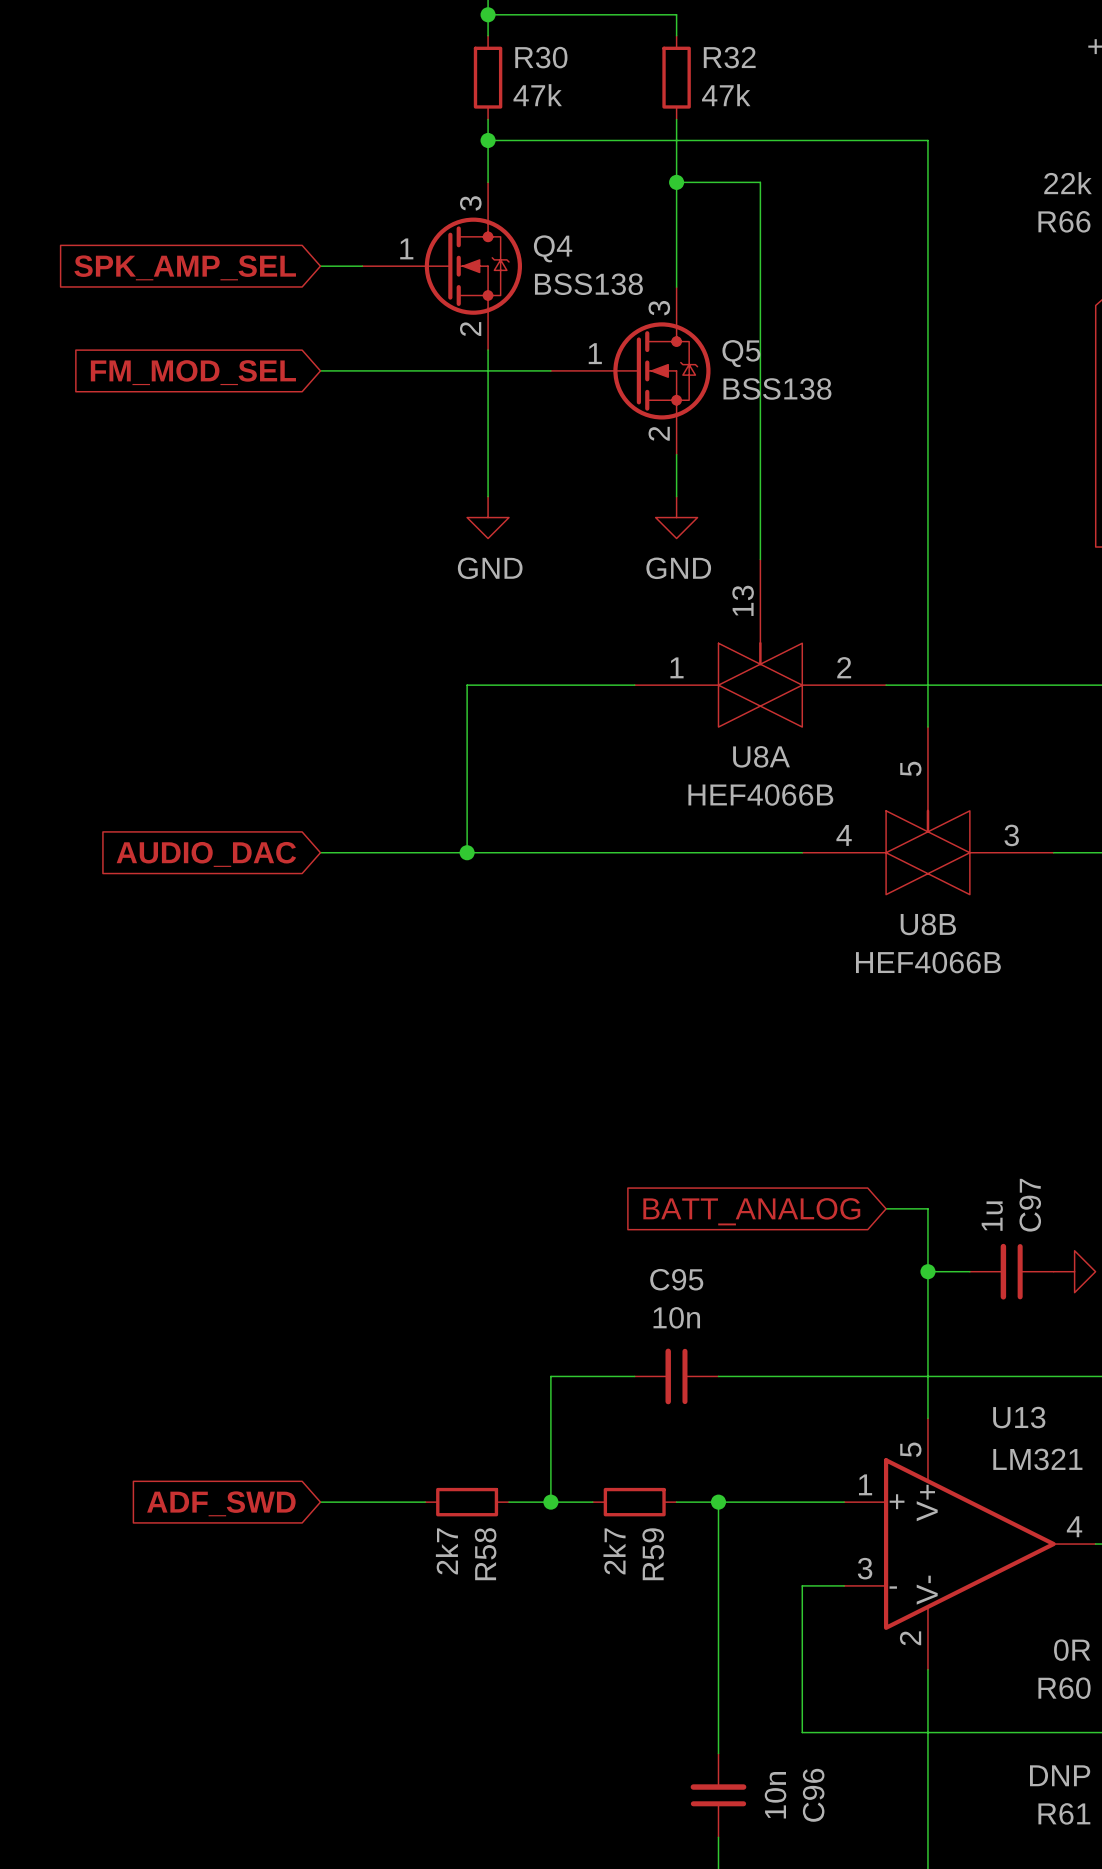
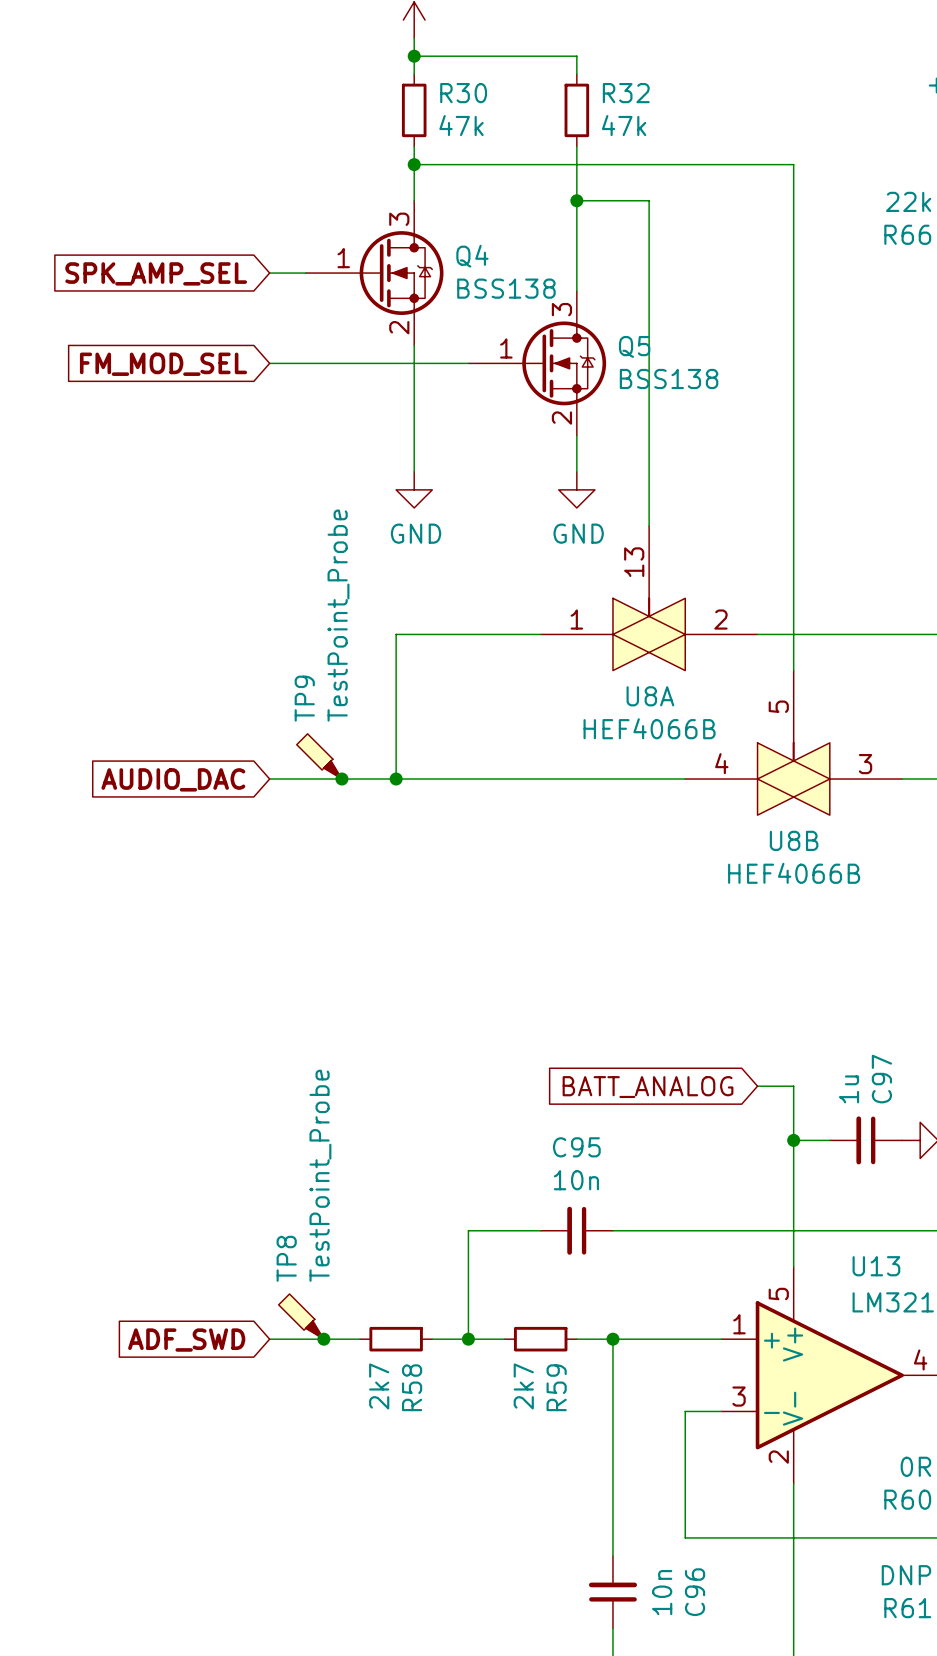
TP9: none -> TestPoint_Probe (319, 756)
junction: none -> (341, 779)
TP8: none -> TestPoint_Probe (301, 1316)
junction: none -> (323, 1339)

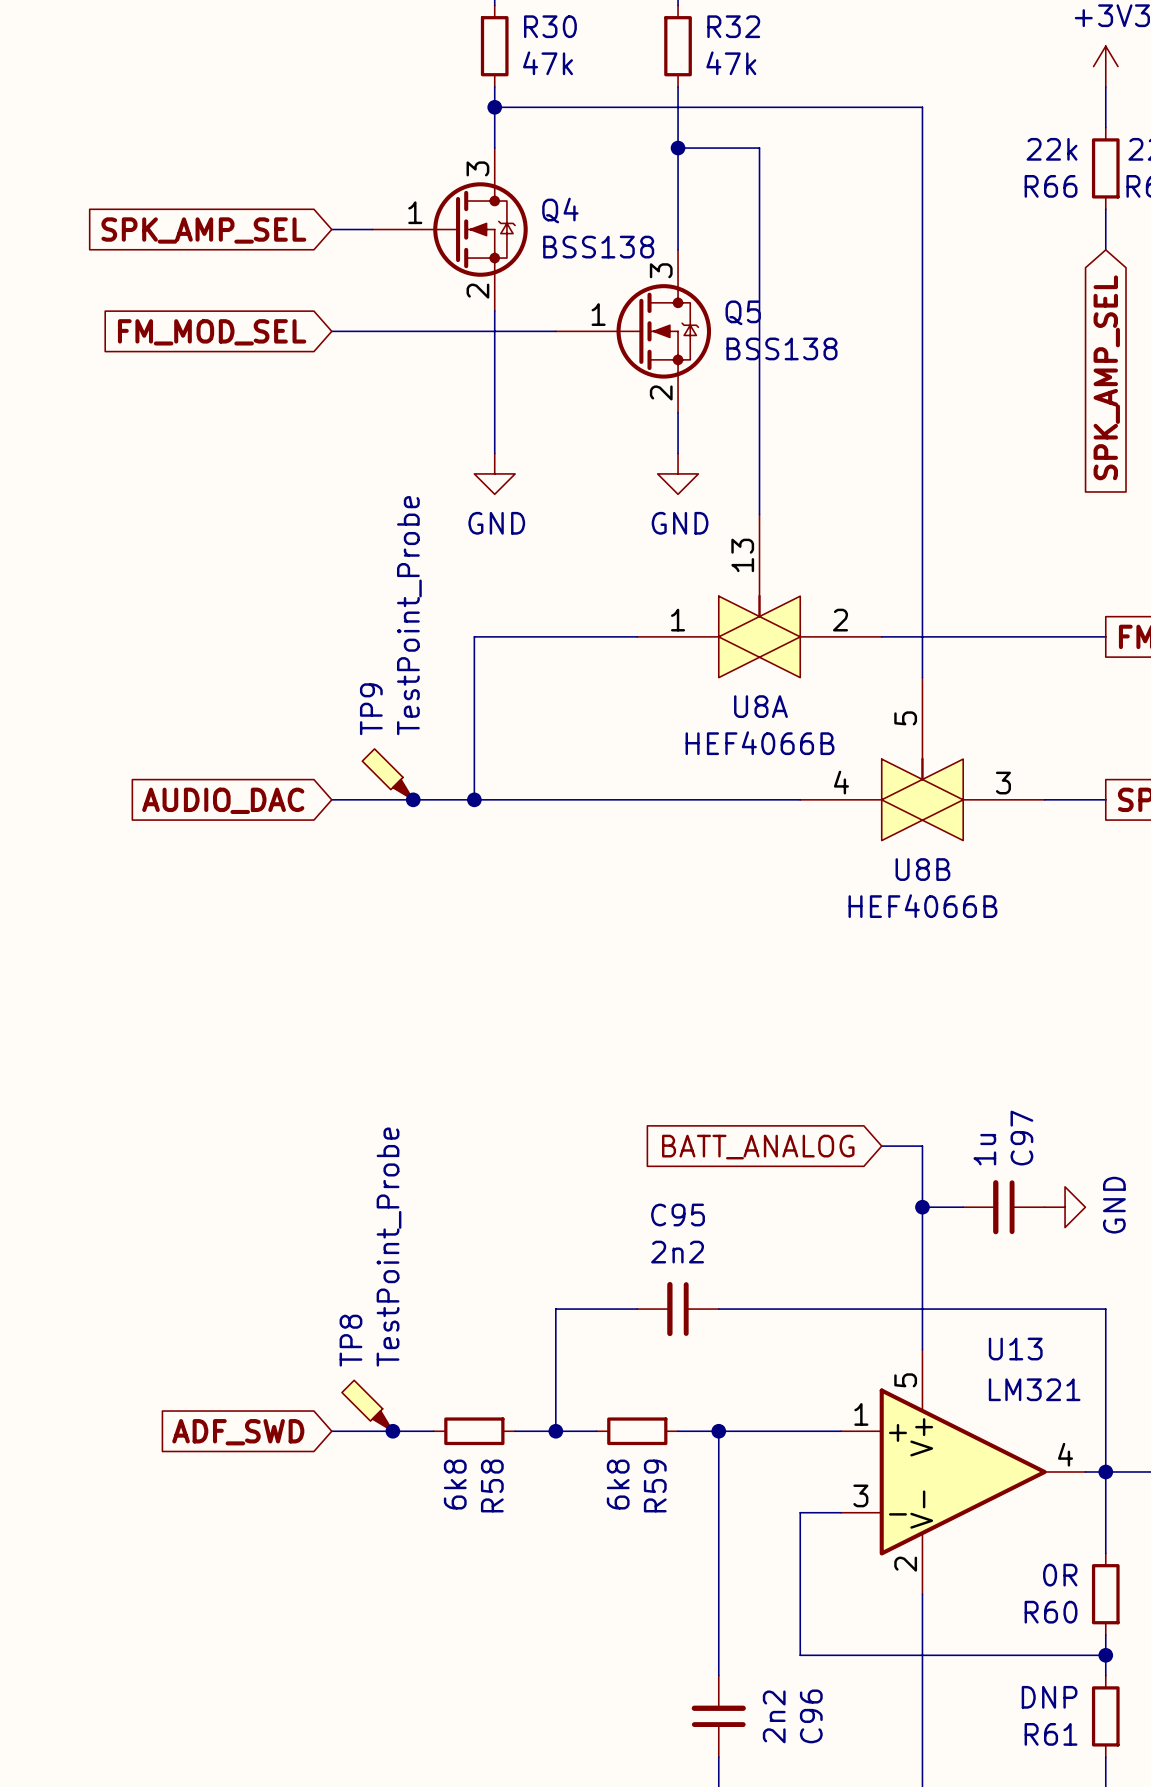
C95 value: 10n (576, 1180) -> 2n2 (677, 1252)
R58 value: 2k7 (379, 1386) -> 6k8 (455, 1484)
R59 value: 2k7 (523, 1386) -> 6k8 (618, 1484)
C96 value: 10n (662, 1592) -> 2n2 (774, 1716)

